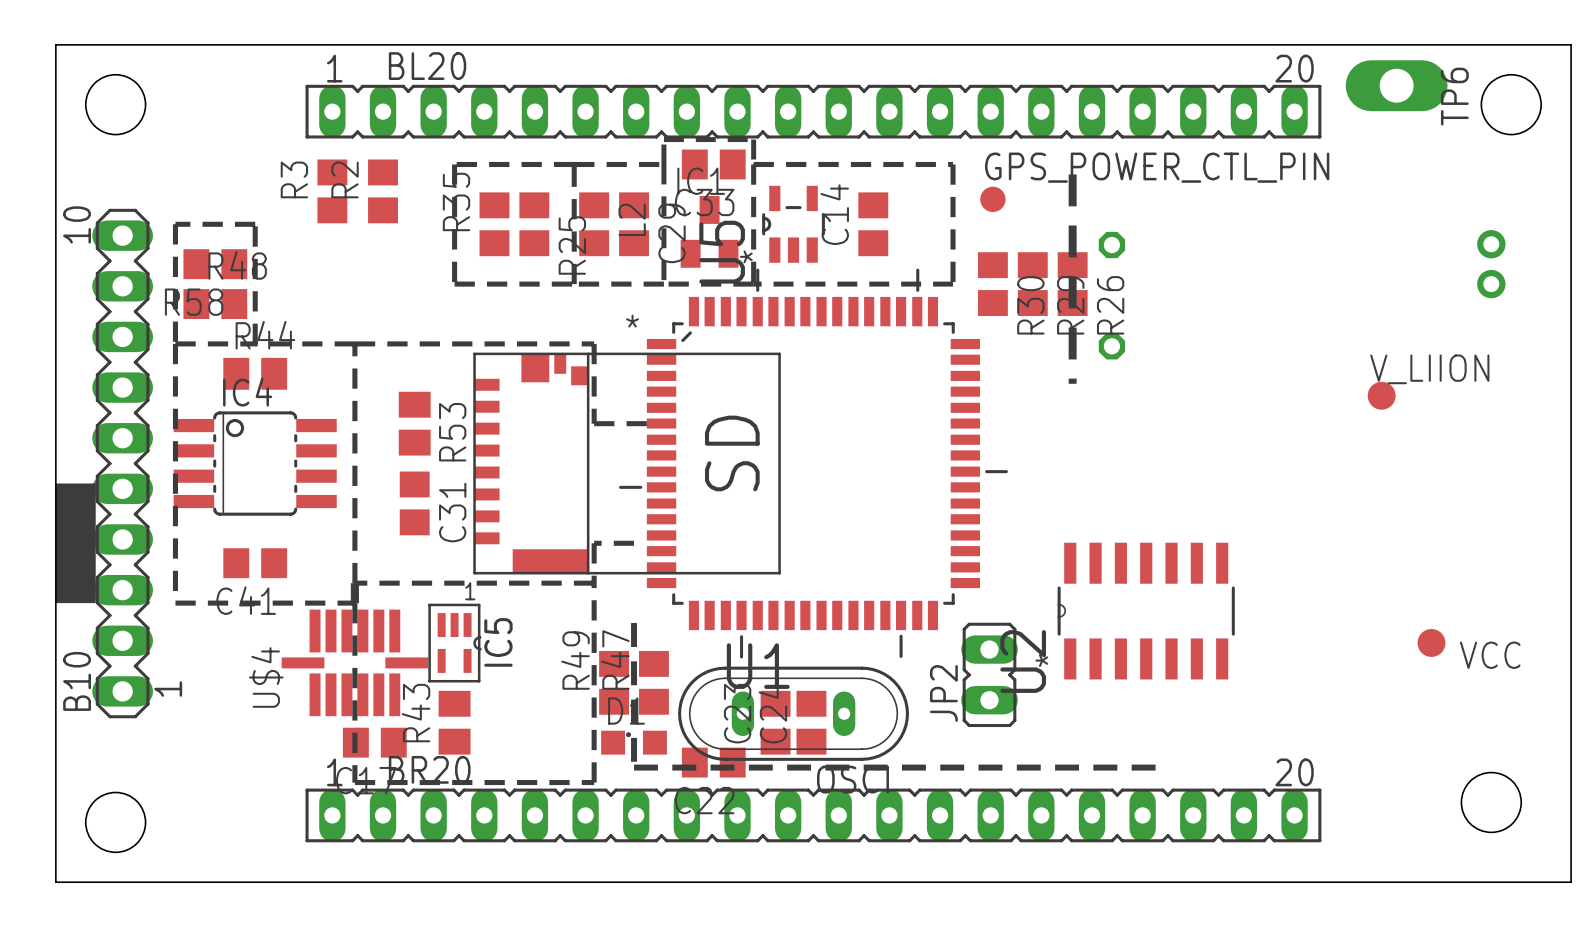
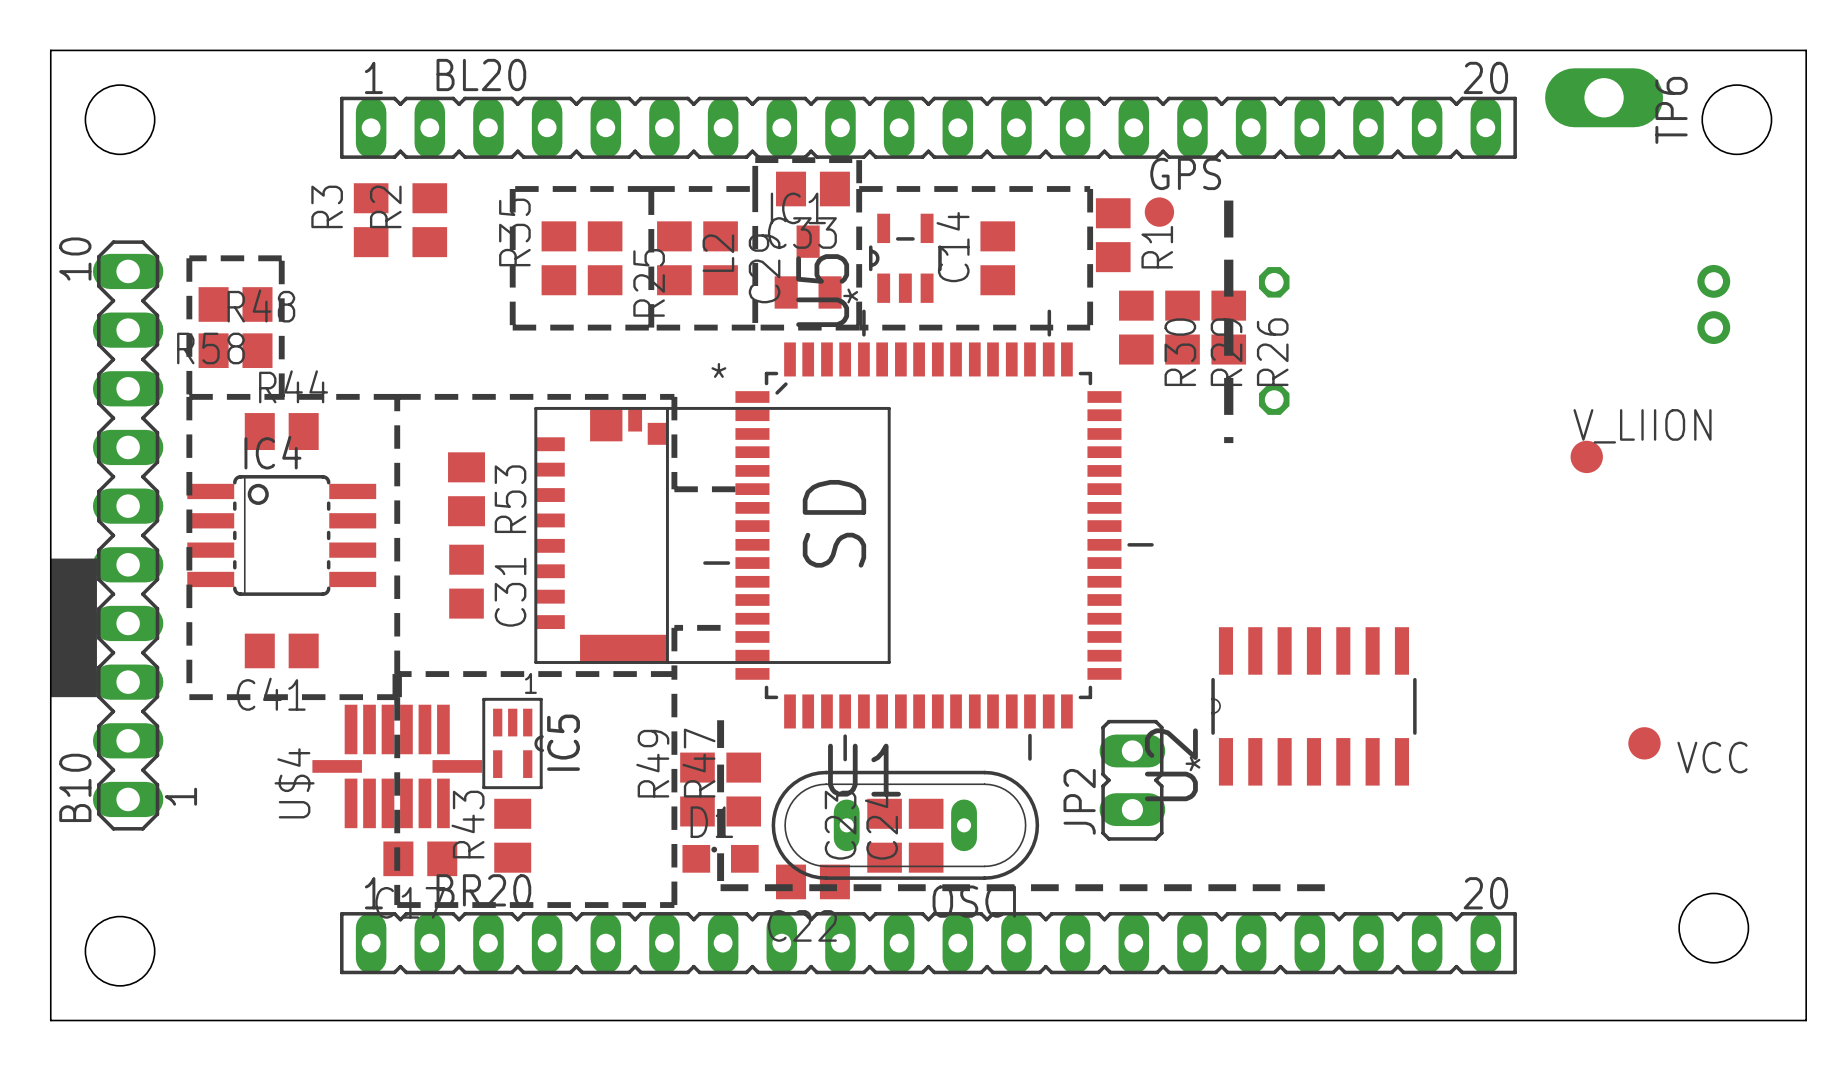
GPS: none -> (1159, 212)
GPS_POWER_CTL_PIN: (992, 199) -> none
R1: none -> (1113, 235)

